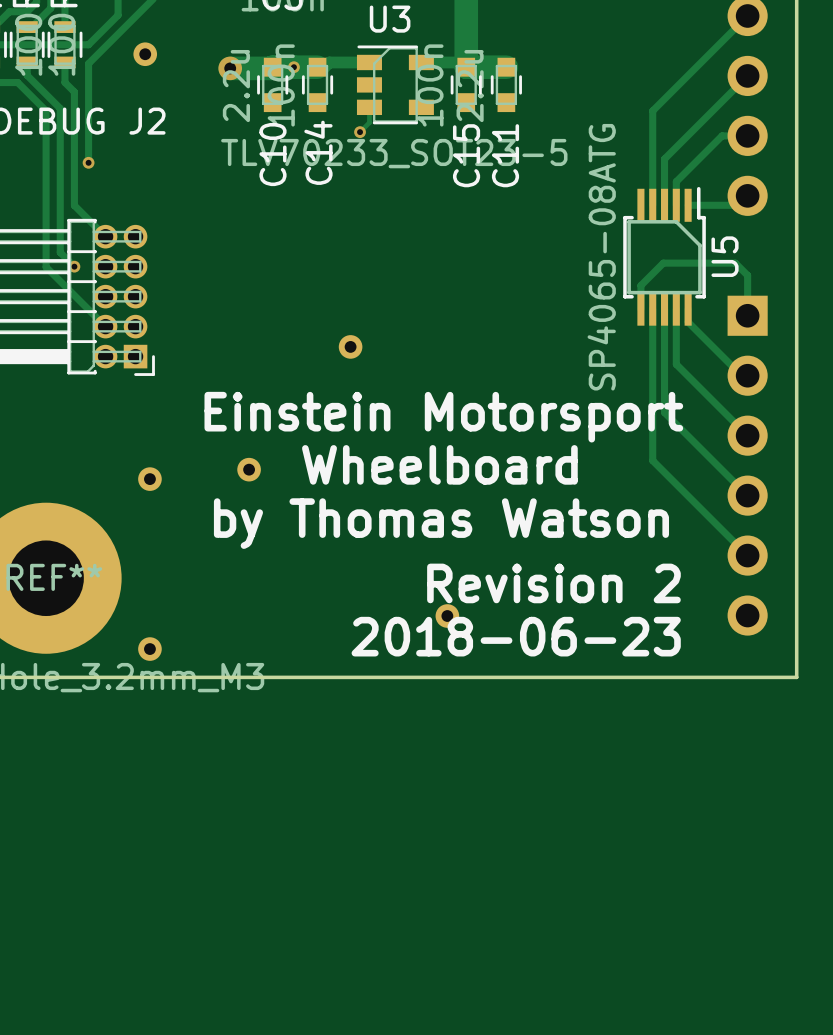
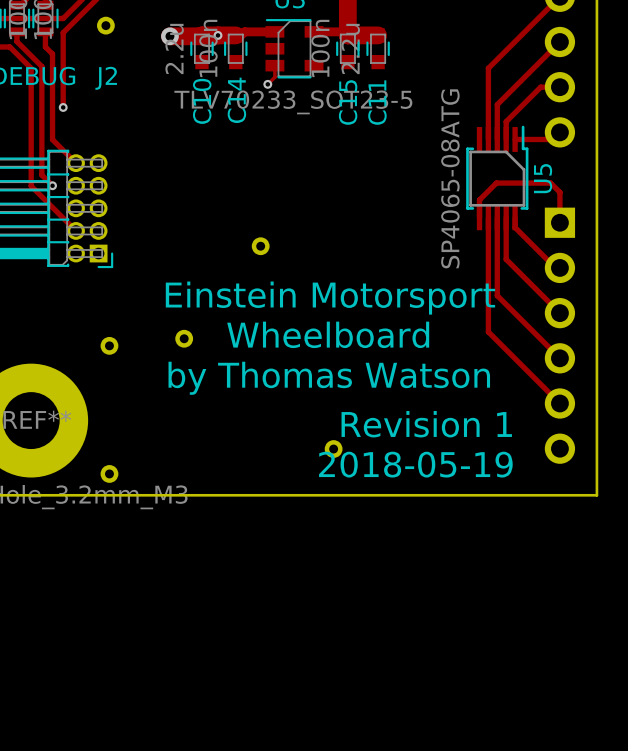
text: Revision 2 (553, 583) -> Revision 1 (426, 424)
text: 2018-06-23 (516, 636) -> 2018-05-19 (415, 464)

